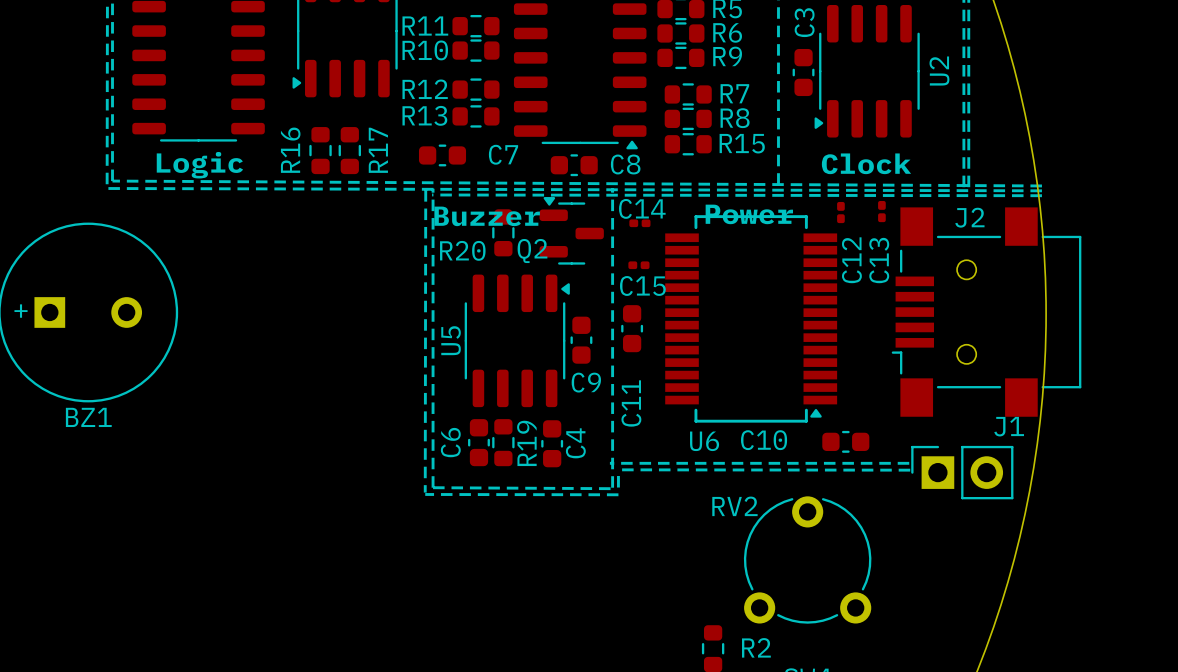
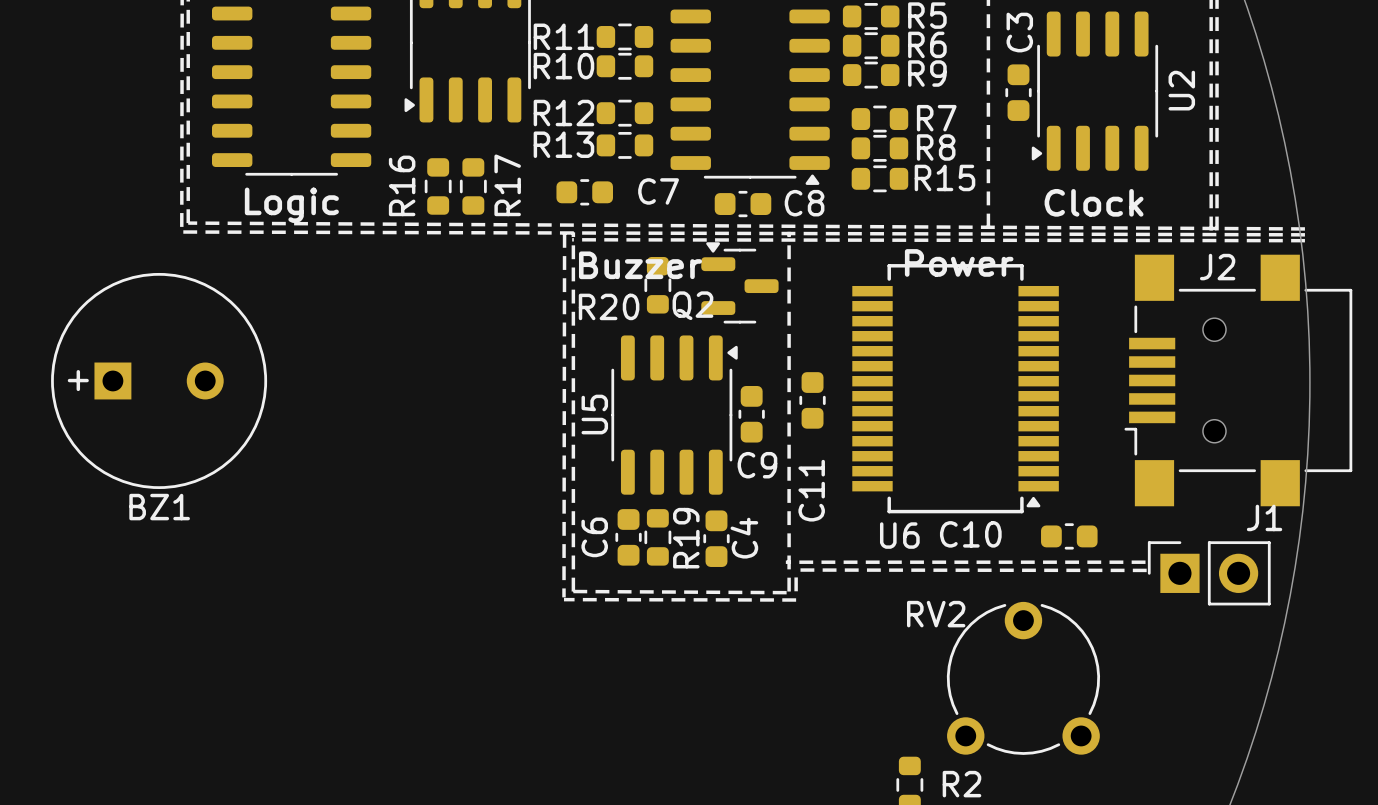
C13: (881, 211) -> none
C12: (840, 212) -> none
C14: (639, 223) -> none
C15: (638, 265) -> none

